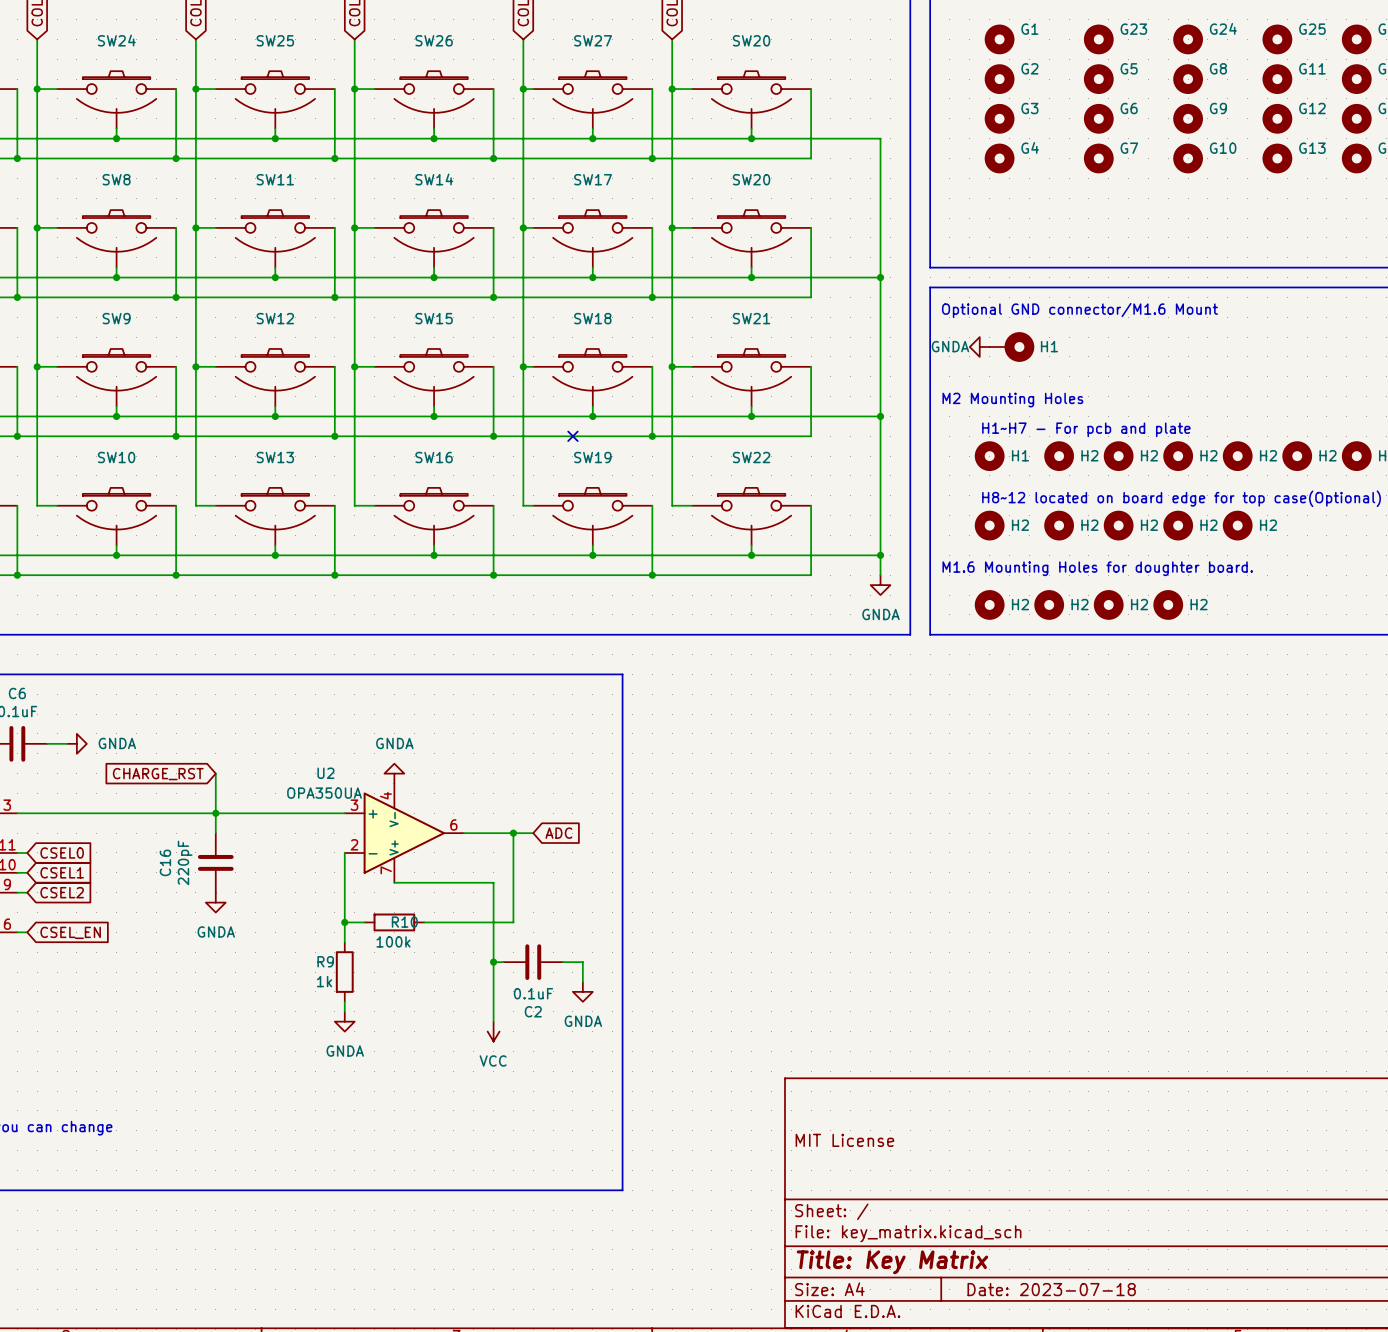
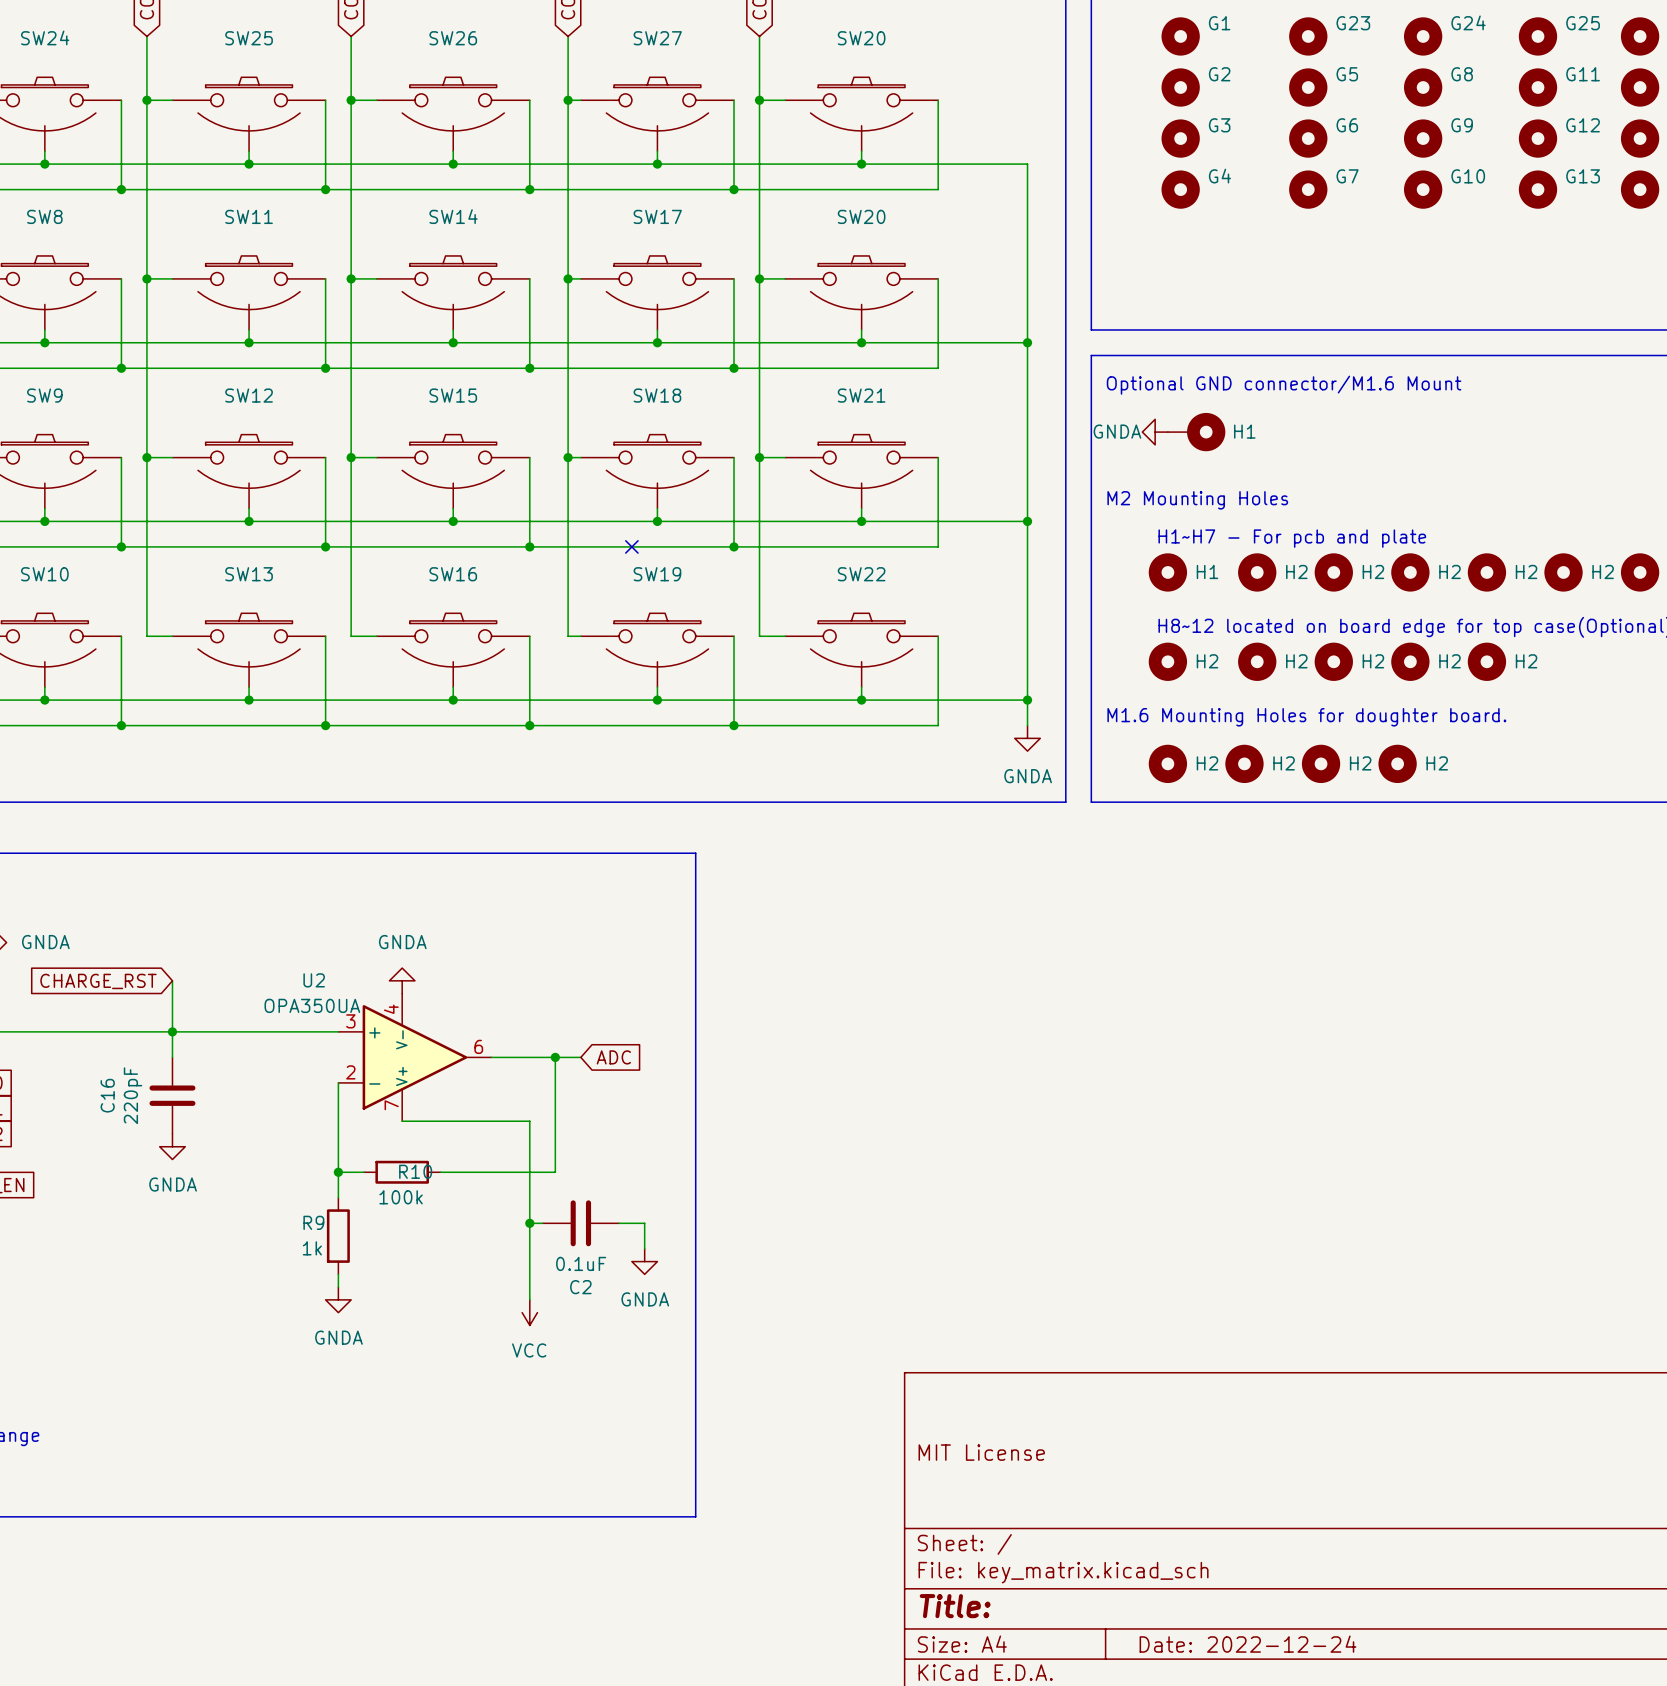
title block: Title: Key Matrix (892, 1262) -> Title: (955, 1606)
title block: Date: 2023-07-18 (1051, 1289) -> Date: 2022-12-24 (1248, 1644)

